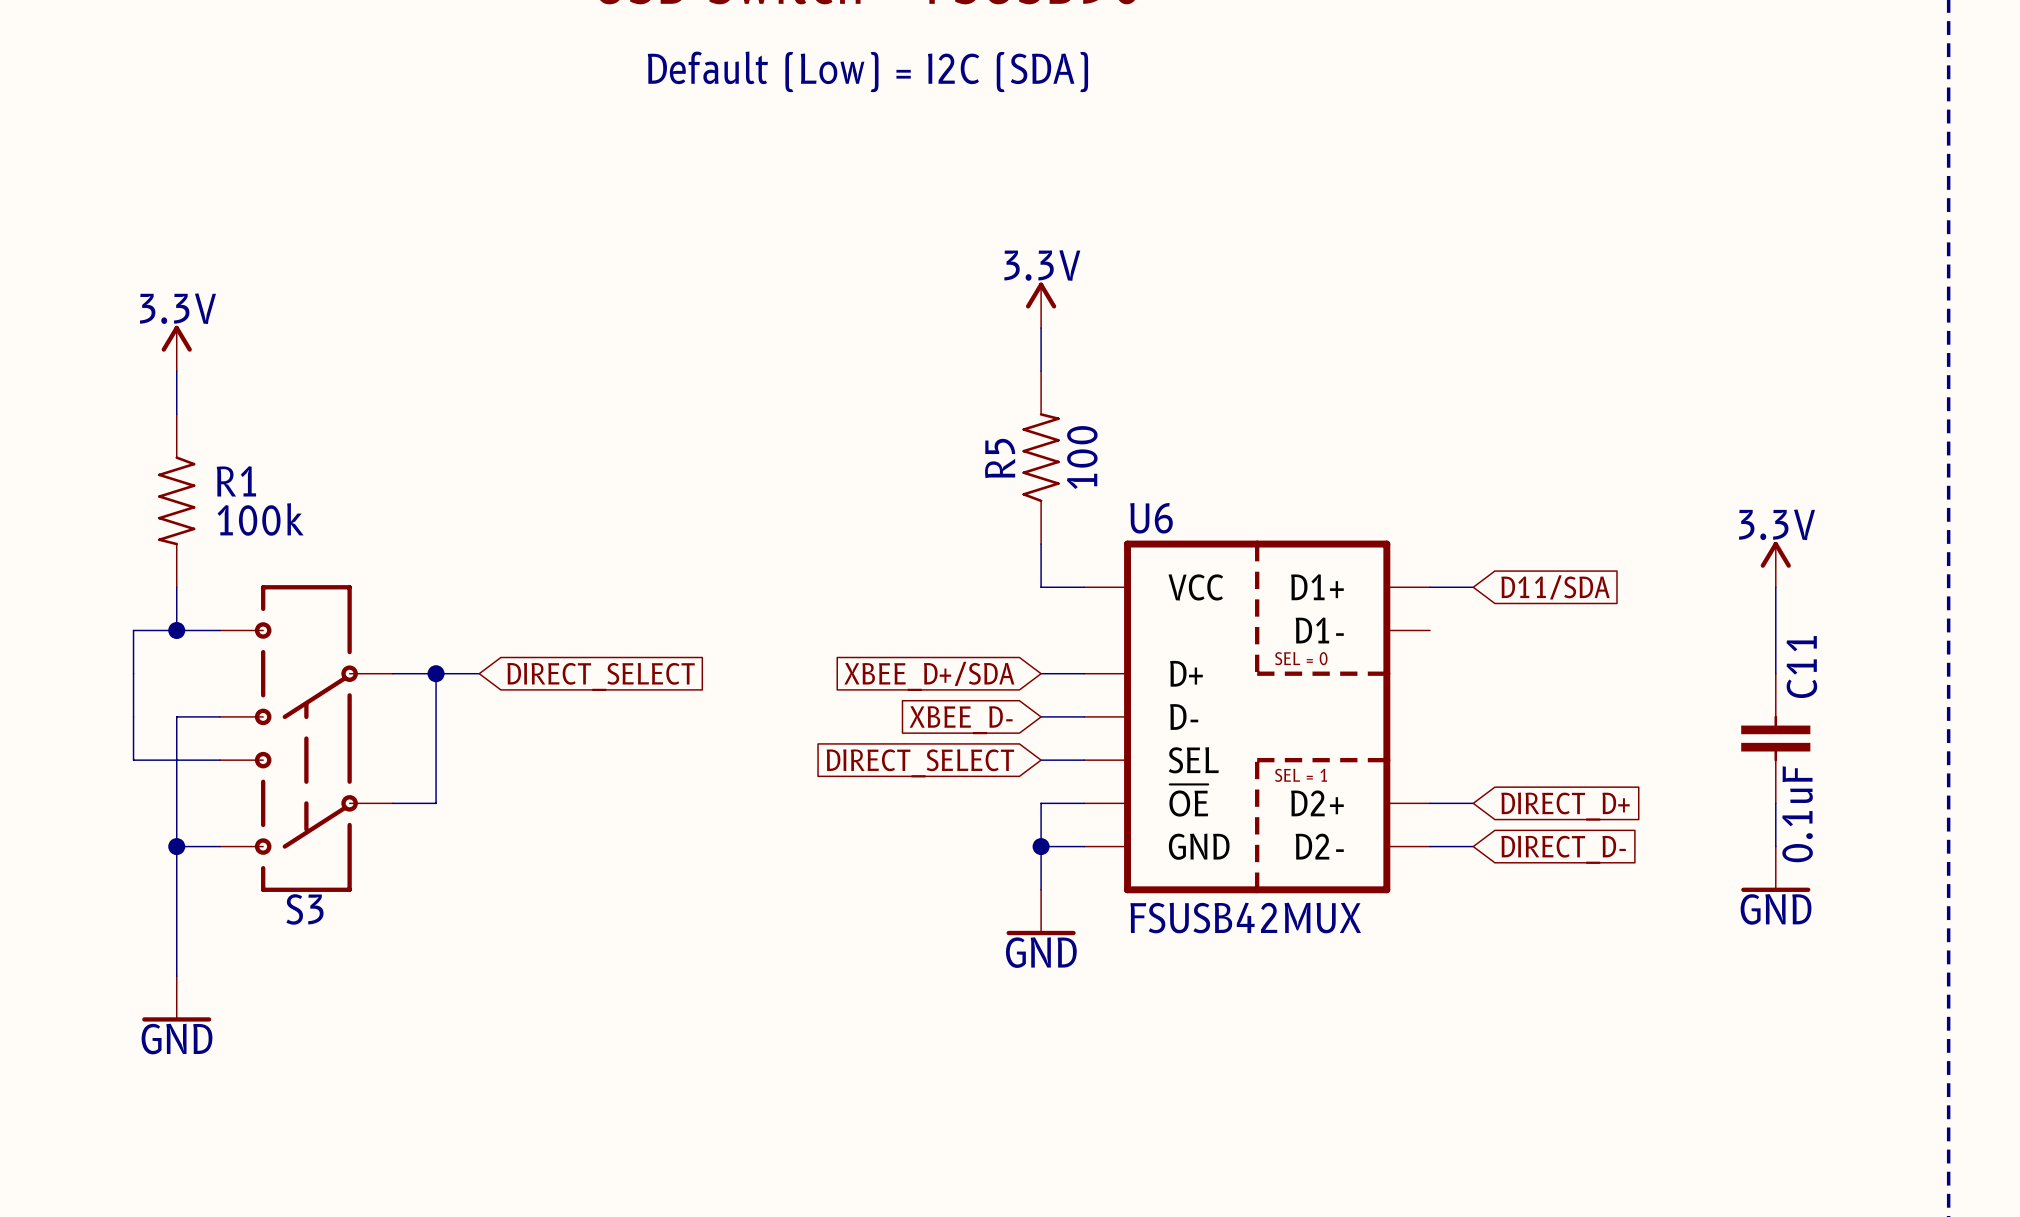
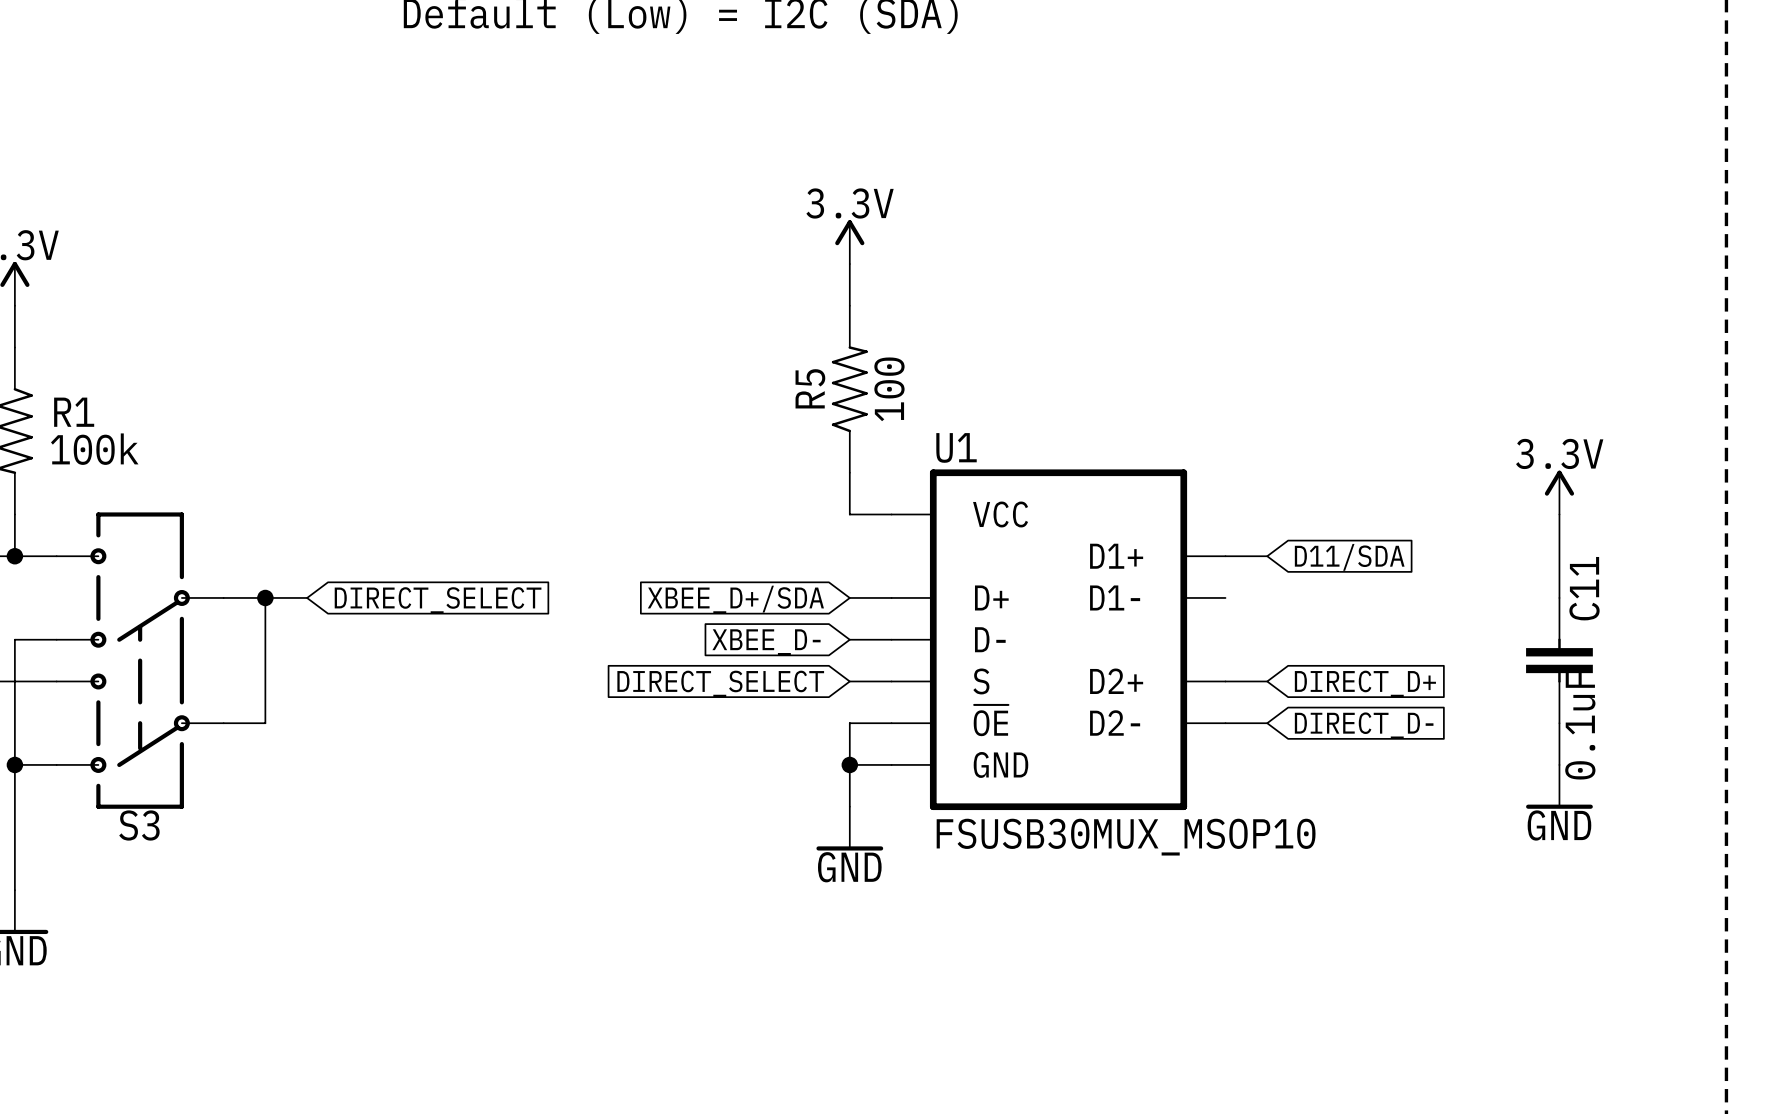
wire: (1430, 587) (1473, 587) -> (1225, 556) (1267, 556)
global label position: D11/SDA (1555, 587) -> D11/SDA (1349, 557)
U6: FSUSB42MUX (1257, 716) -> none
U1: none -> FSUSB30MUX_MSOP10 (1058, 639)
global label: none -> DIRECT_D+ (1365, 683)
global label: DIRECT_D+ (1565, 806) -> DIRECT_D- (1364, 725)
wire: (1430, 846) (1473, 846) -> (1225, 681) (1267, 681)
global label: DIRECT_D- (1563, 849) -> none

